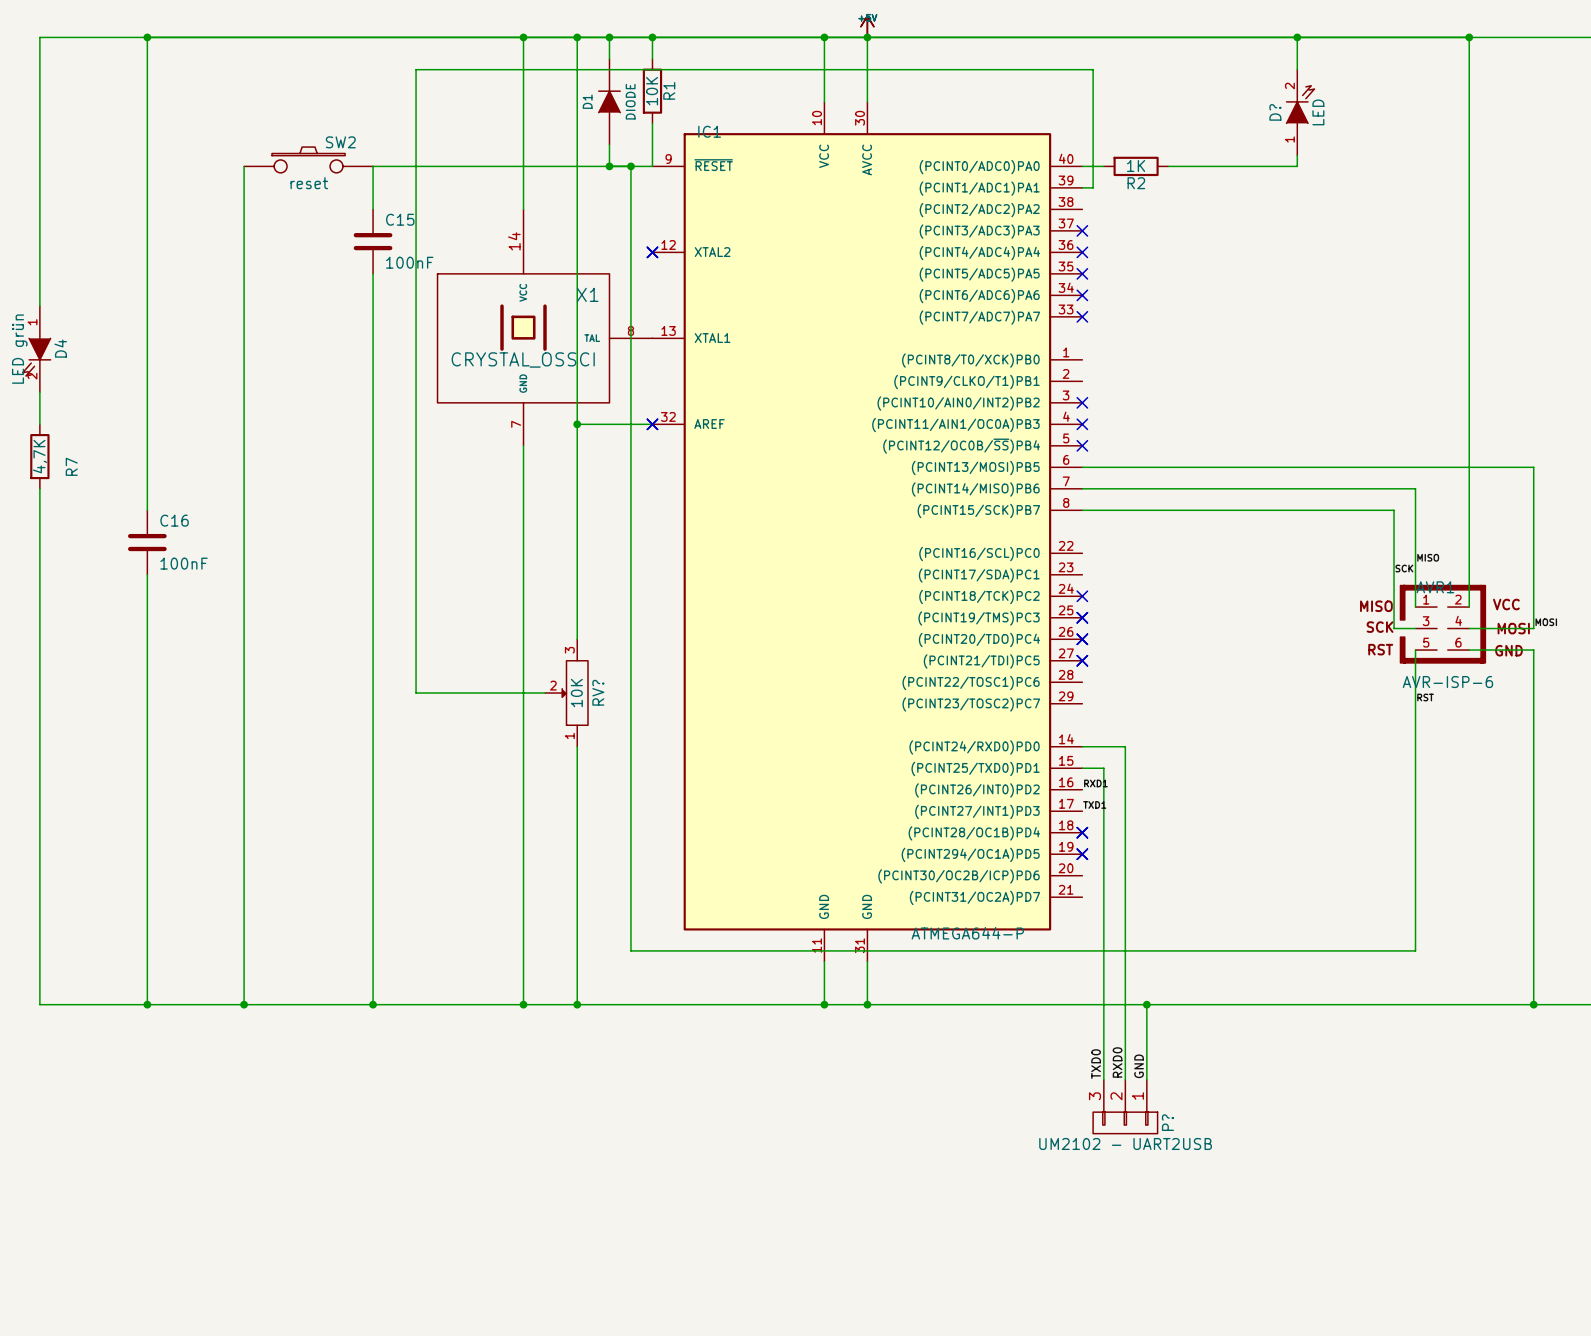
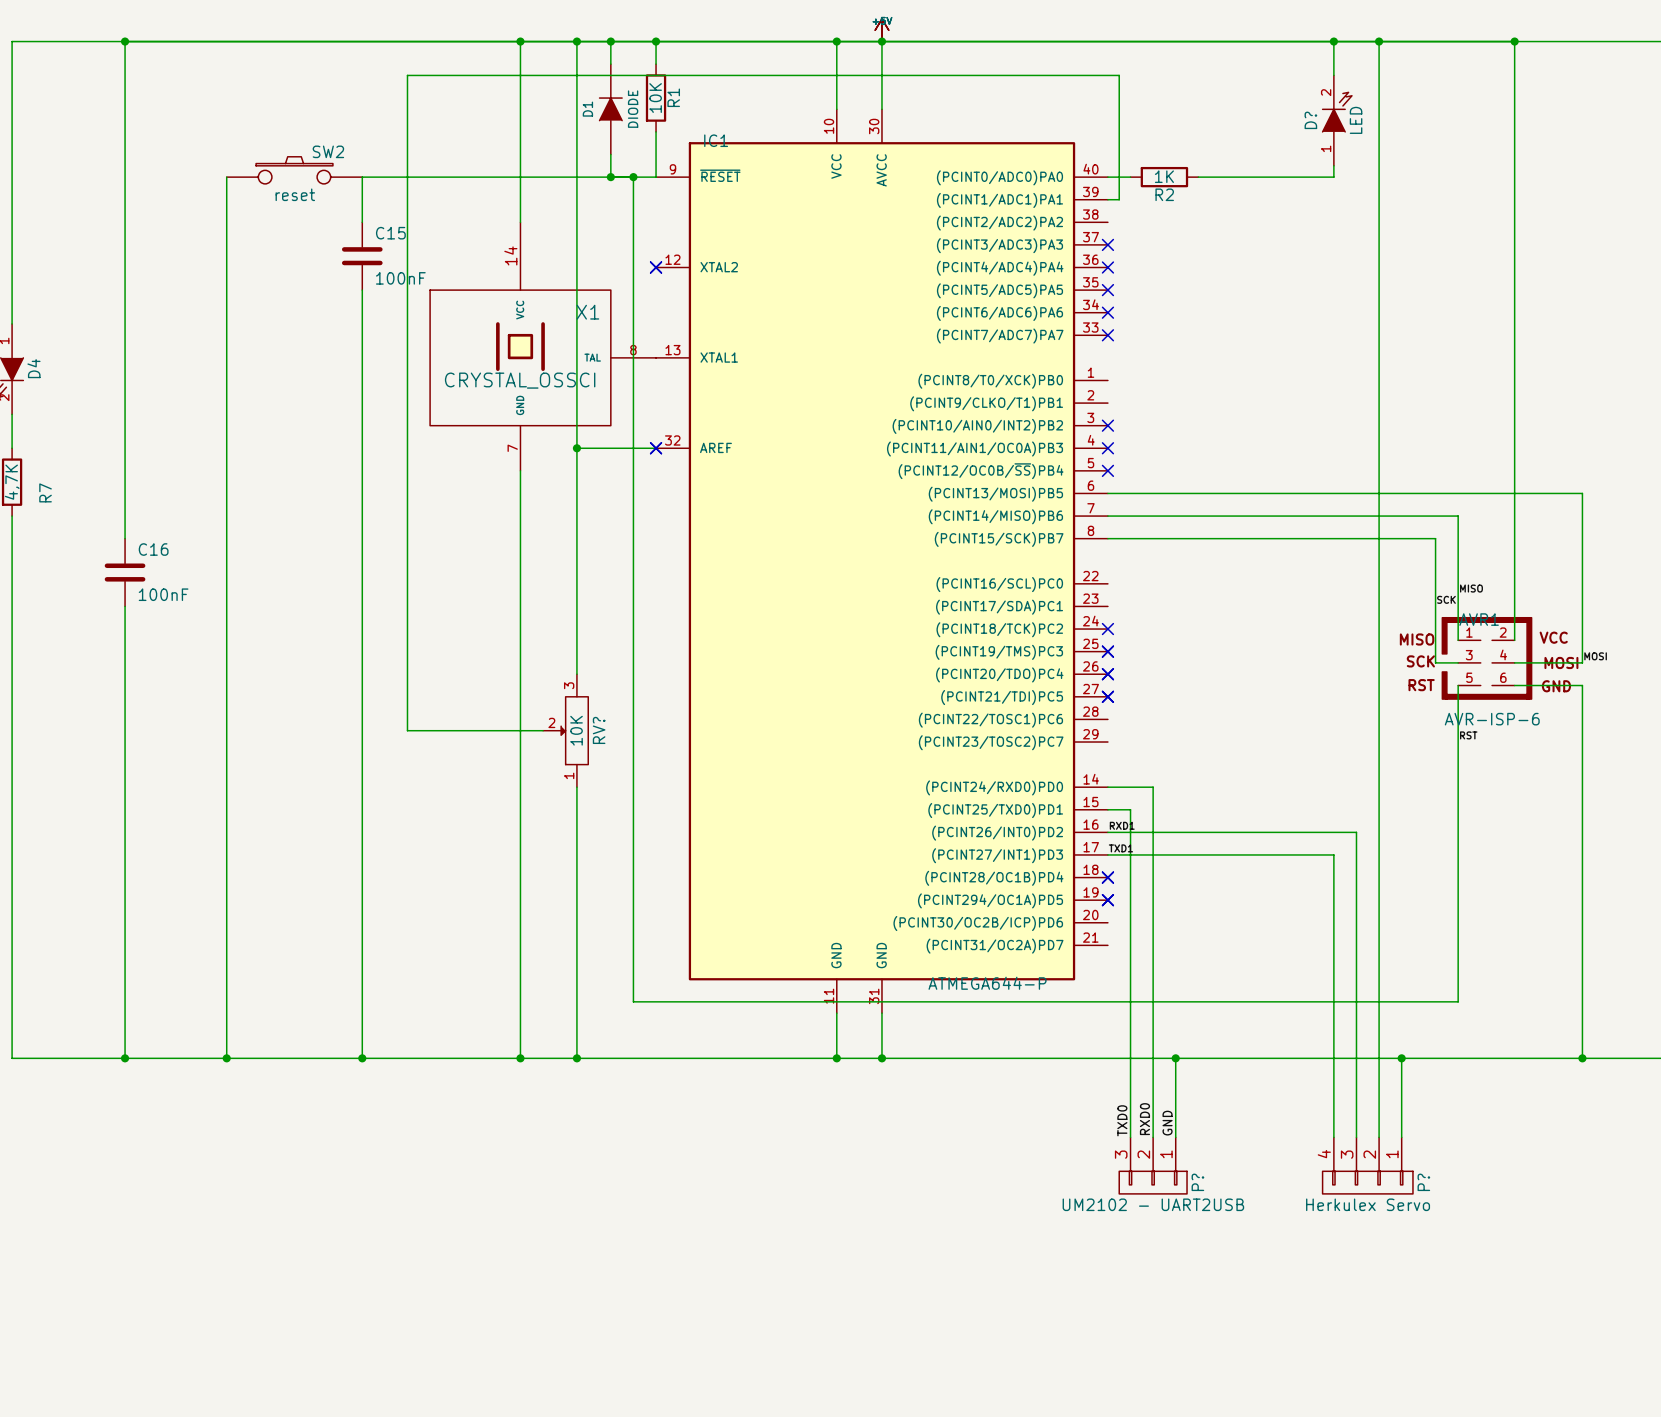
wire: none -> (1379, 41) (1379, 1137)
junction: none -> (1379, 41)
wire: none -> (1107, 832) (1356, 832) (1356, 1137)
wire: none -> (1107, 854) (1333, 854) (1333, 1137)
wire: none -> (1401, 1058) (1401, 1137)
junction: none -> (1401, 1058)
P?: none -> Herkulex Servo (1367, 1165)

